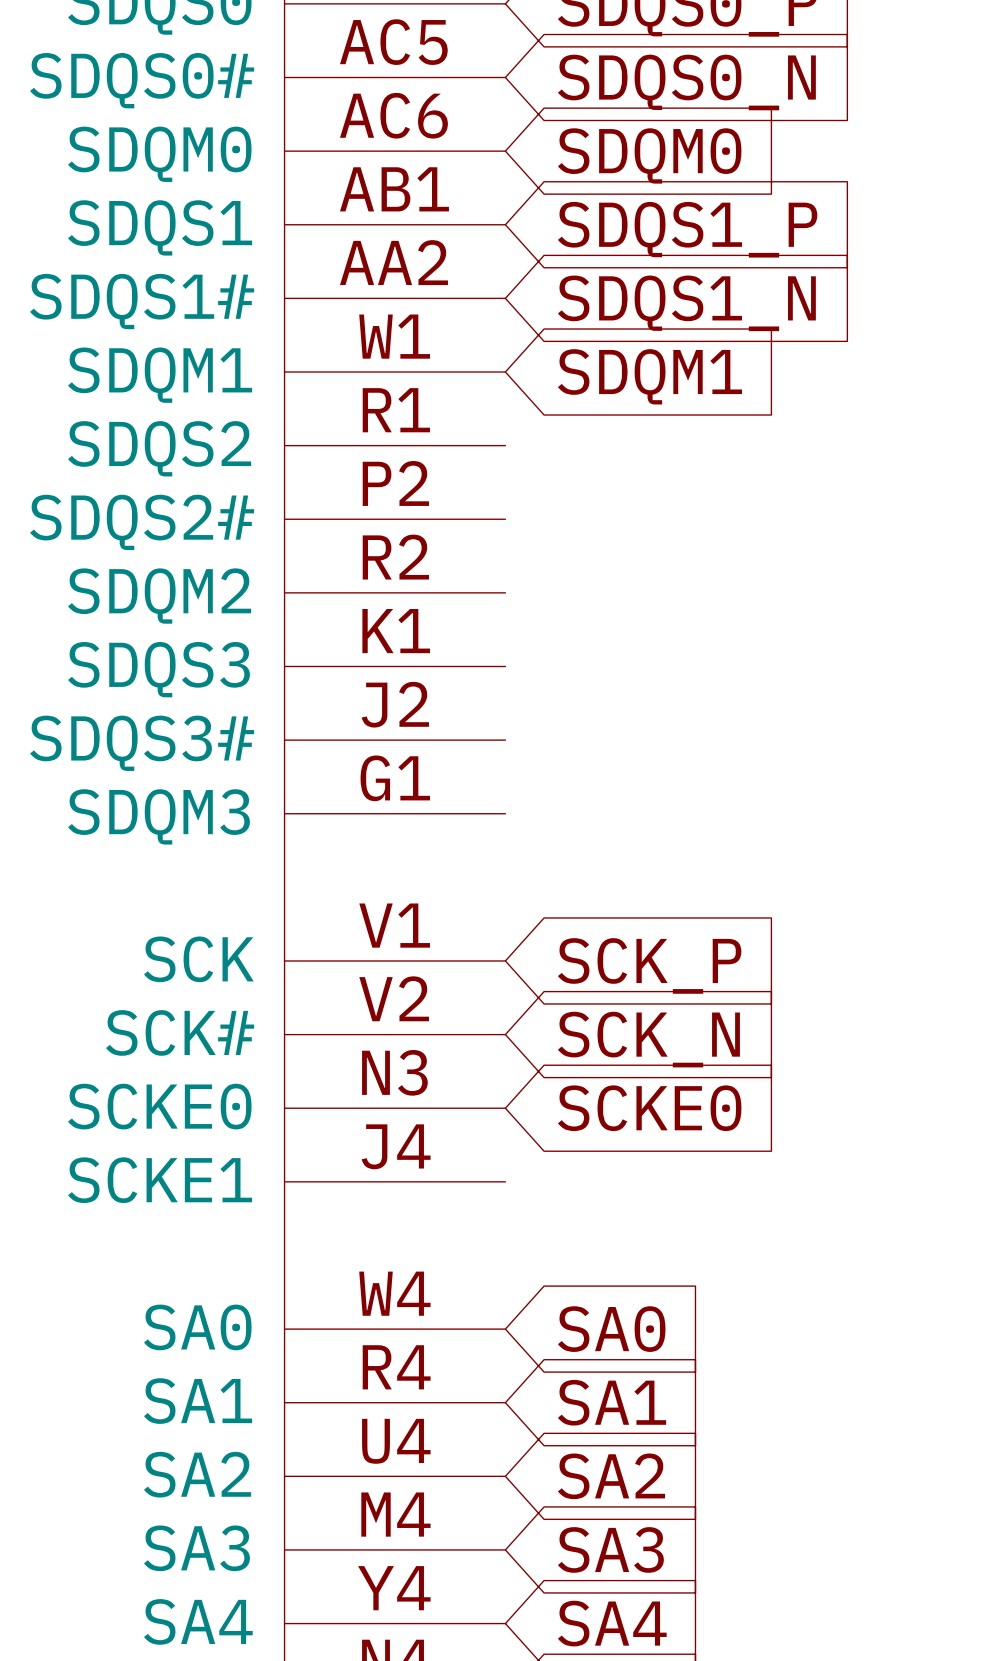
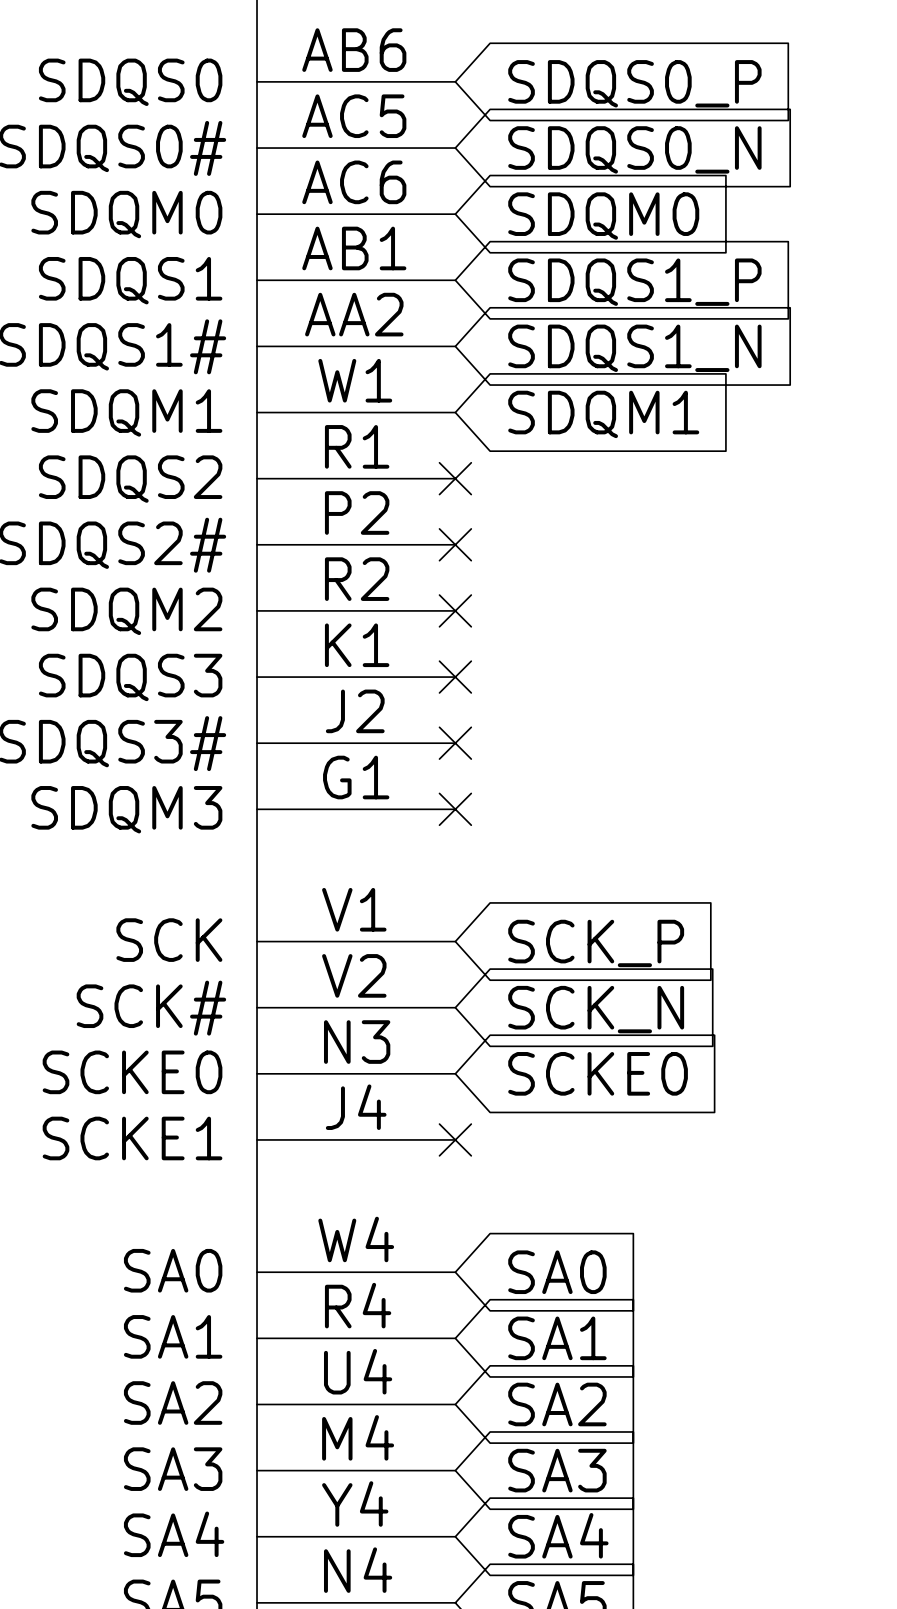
no-connect mark: none -> (455, 478)
no-connect mark: none -> (455, 544)
no-connect mark: none -> (455, 610)
no-connect mark: none -> (455, 677)
no-connect mark: none -> (455, 743)
no-connect mark: none -> (455, 809)
no-connect mark: none -> (455, 1139)

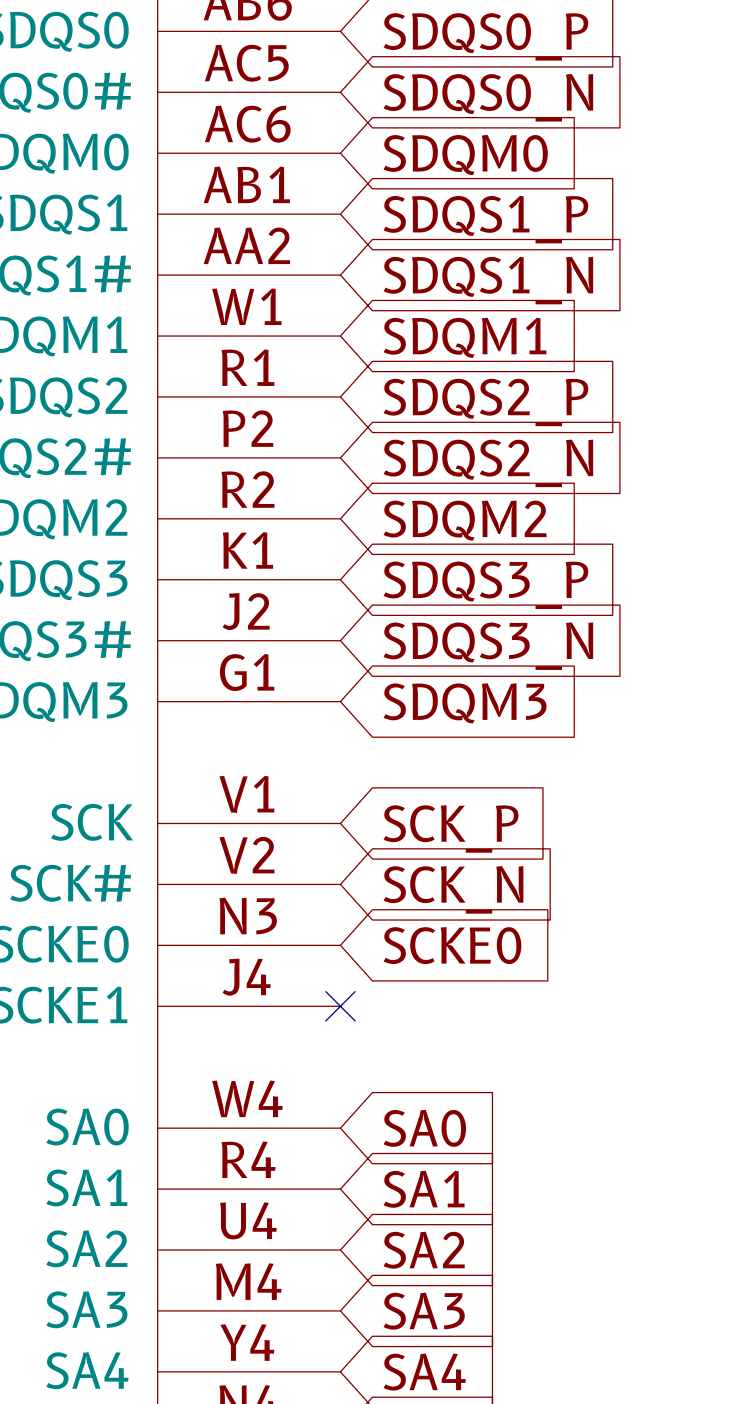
no-connect mark: (455, 478) -> none
global label: none -> SDQS2_P (485, 402)
no-connect mark: (455, 544) -> none
global label: none -> SDQS2_N (488, 463)
no-connect mark: (455, 610) -> none
global label: none -> SDQM2 (465, 520)
no-connect mark: (455, 677) -> none
global label: none -> SDQS3_P (485, 585)
no-connect mark: (455, 743) -> none
global label: none -> SDQS3_N (488, 646)
no-connect mark: (455, 809) -> none
global label: none -> SDQM3 (465, 703)

